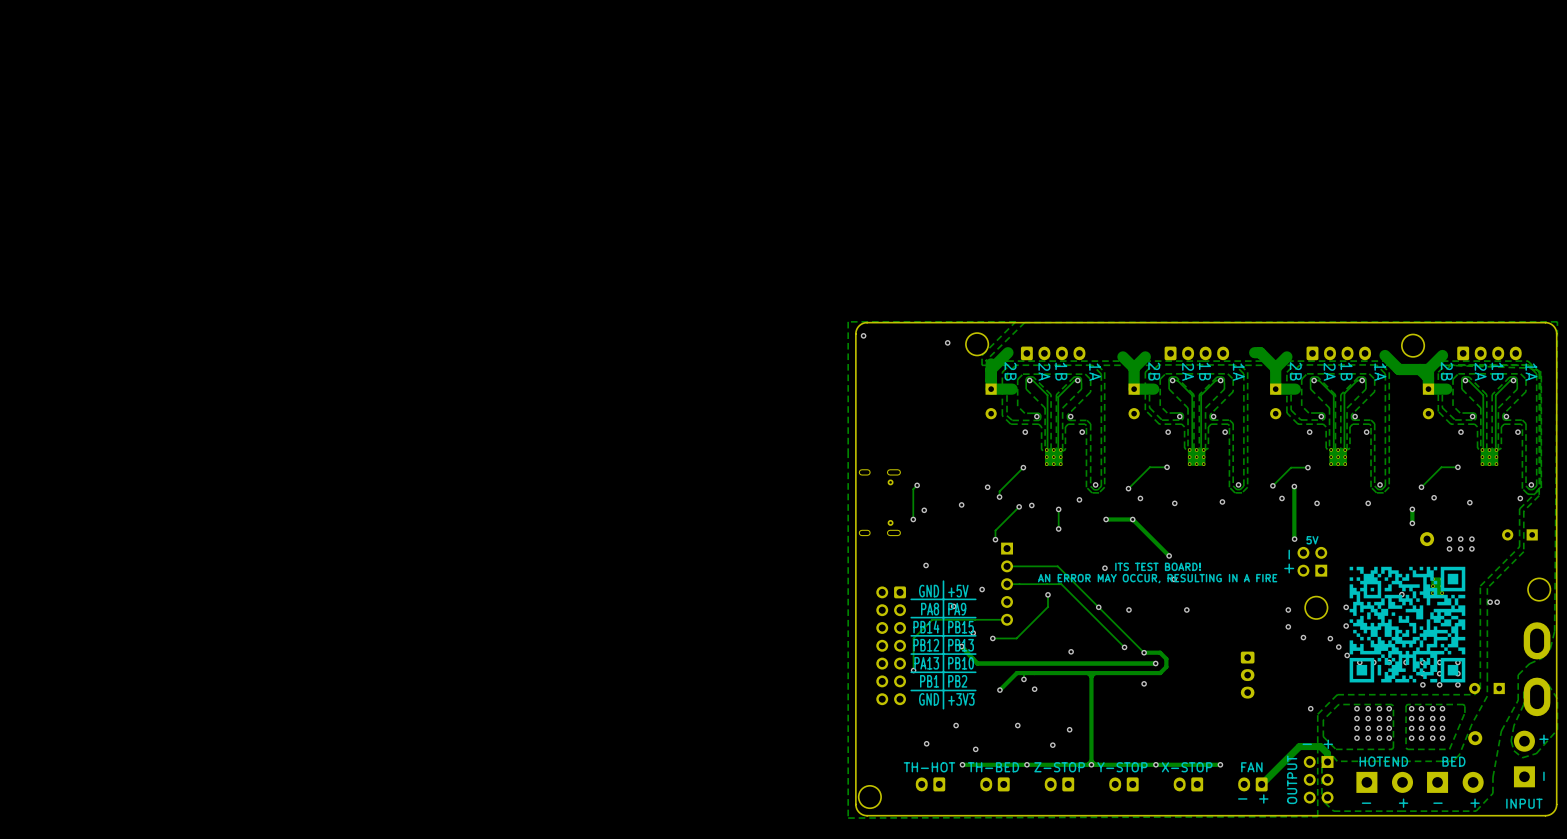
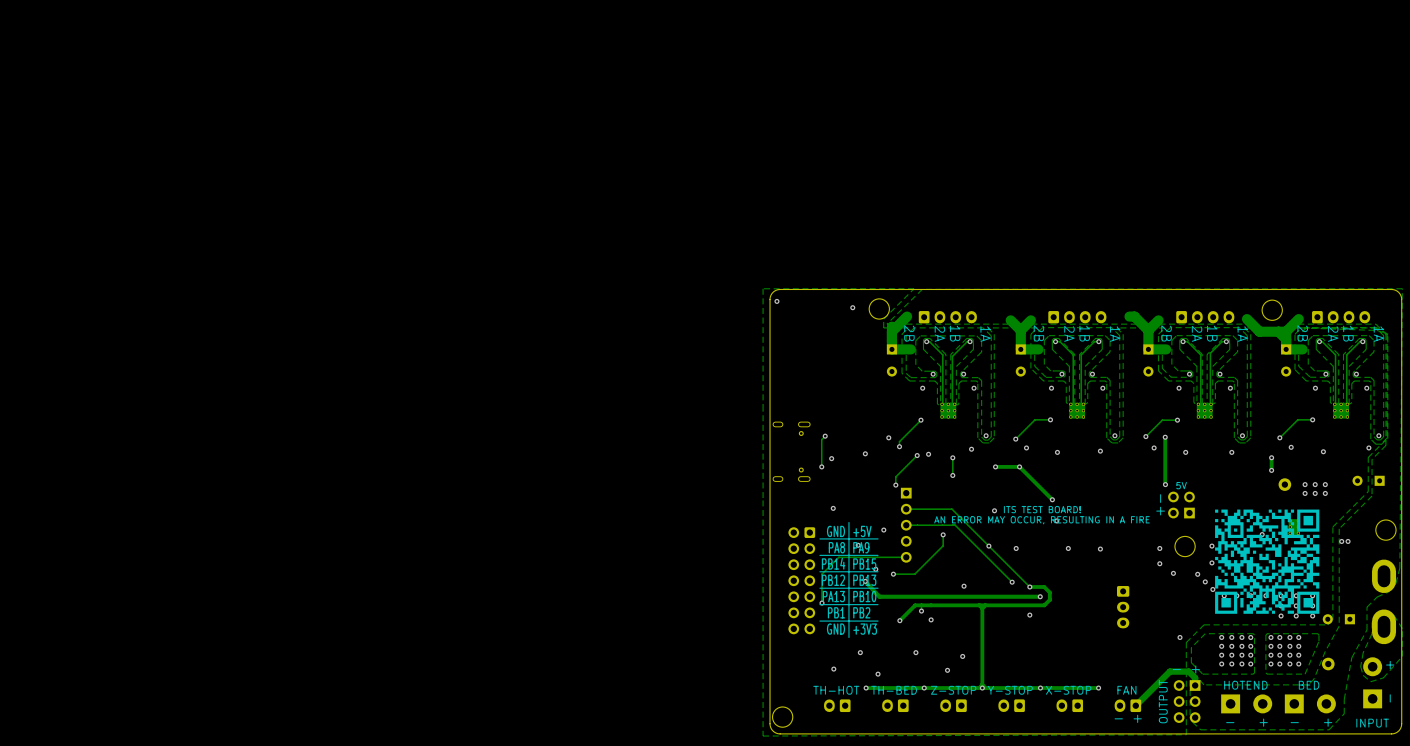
via: none -> (1100, 549)

